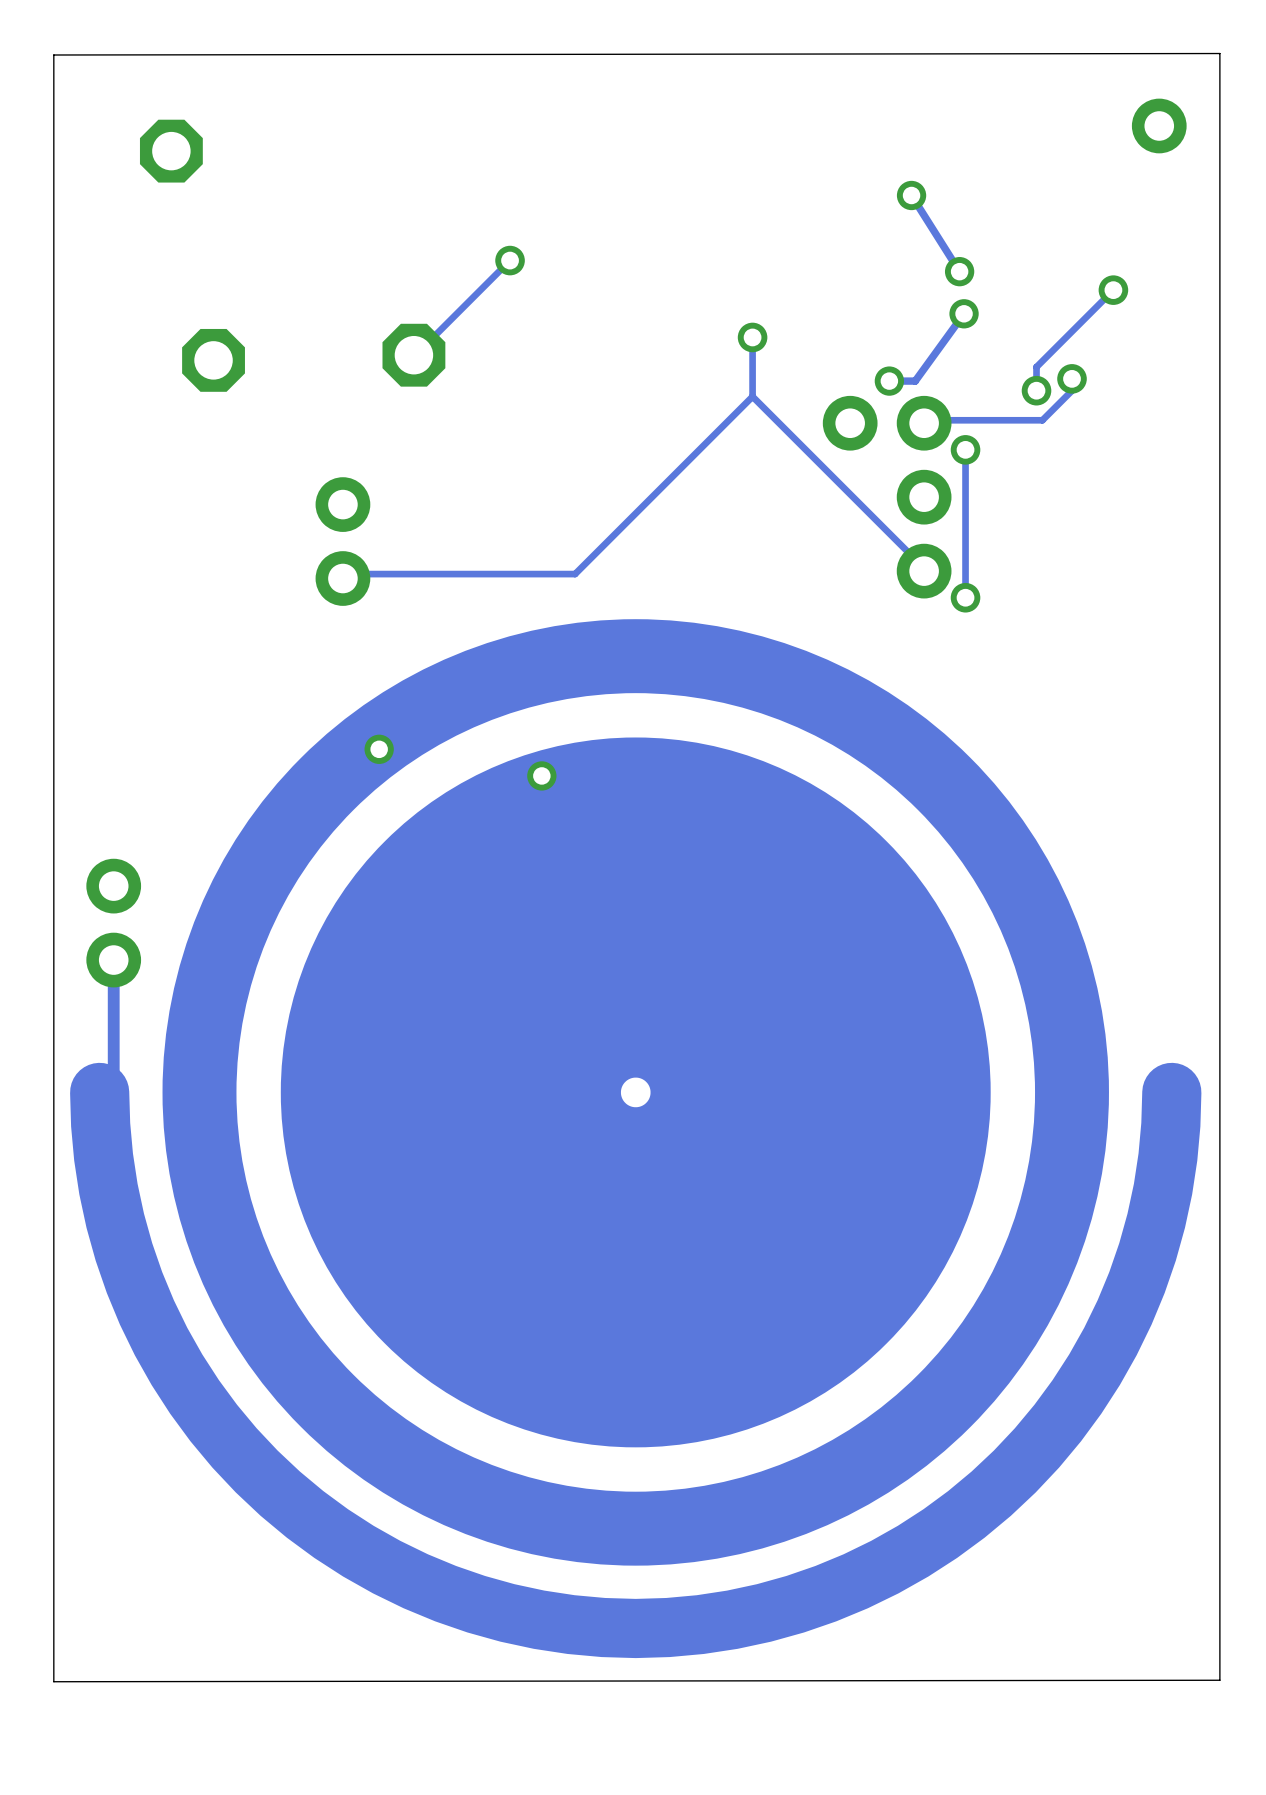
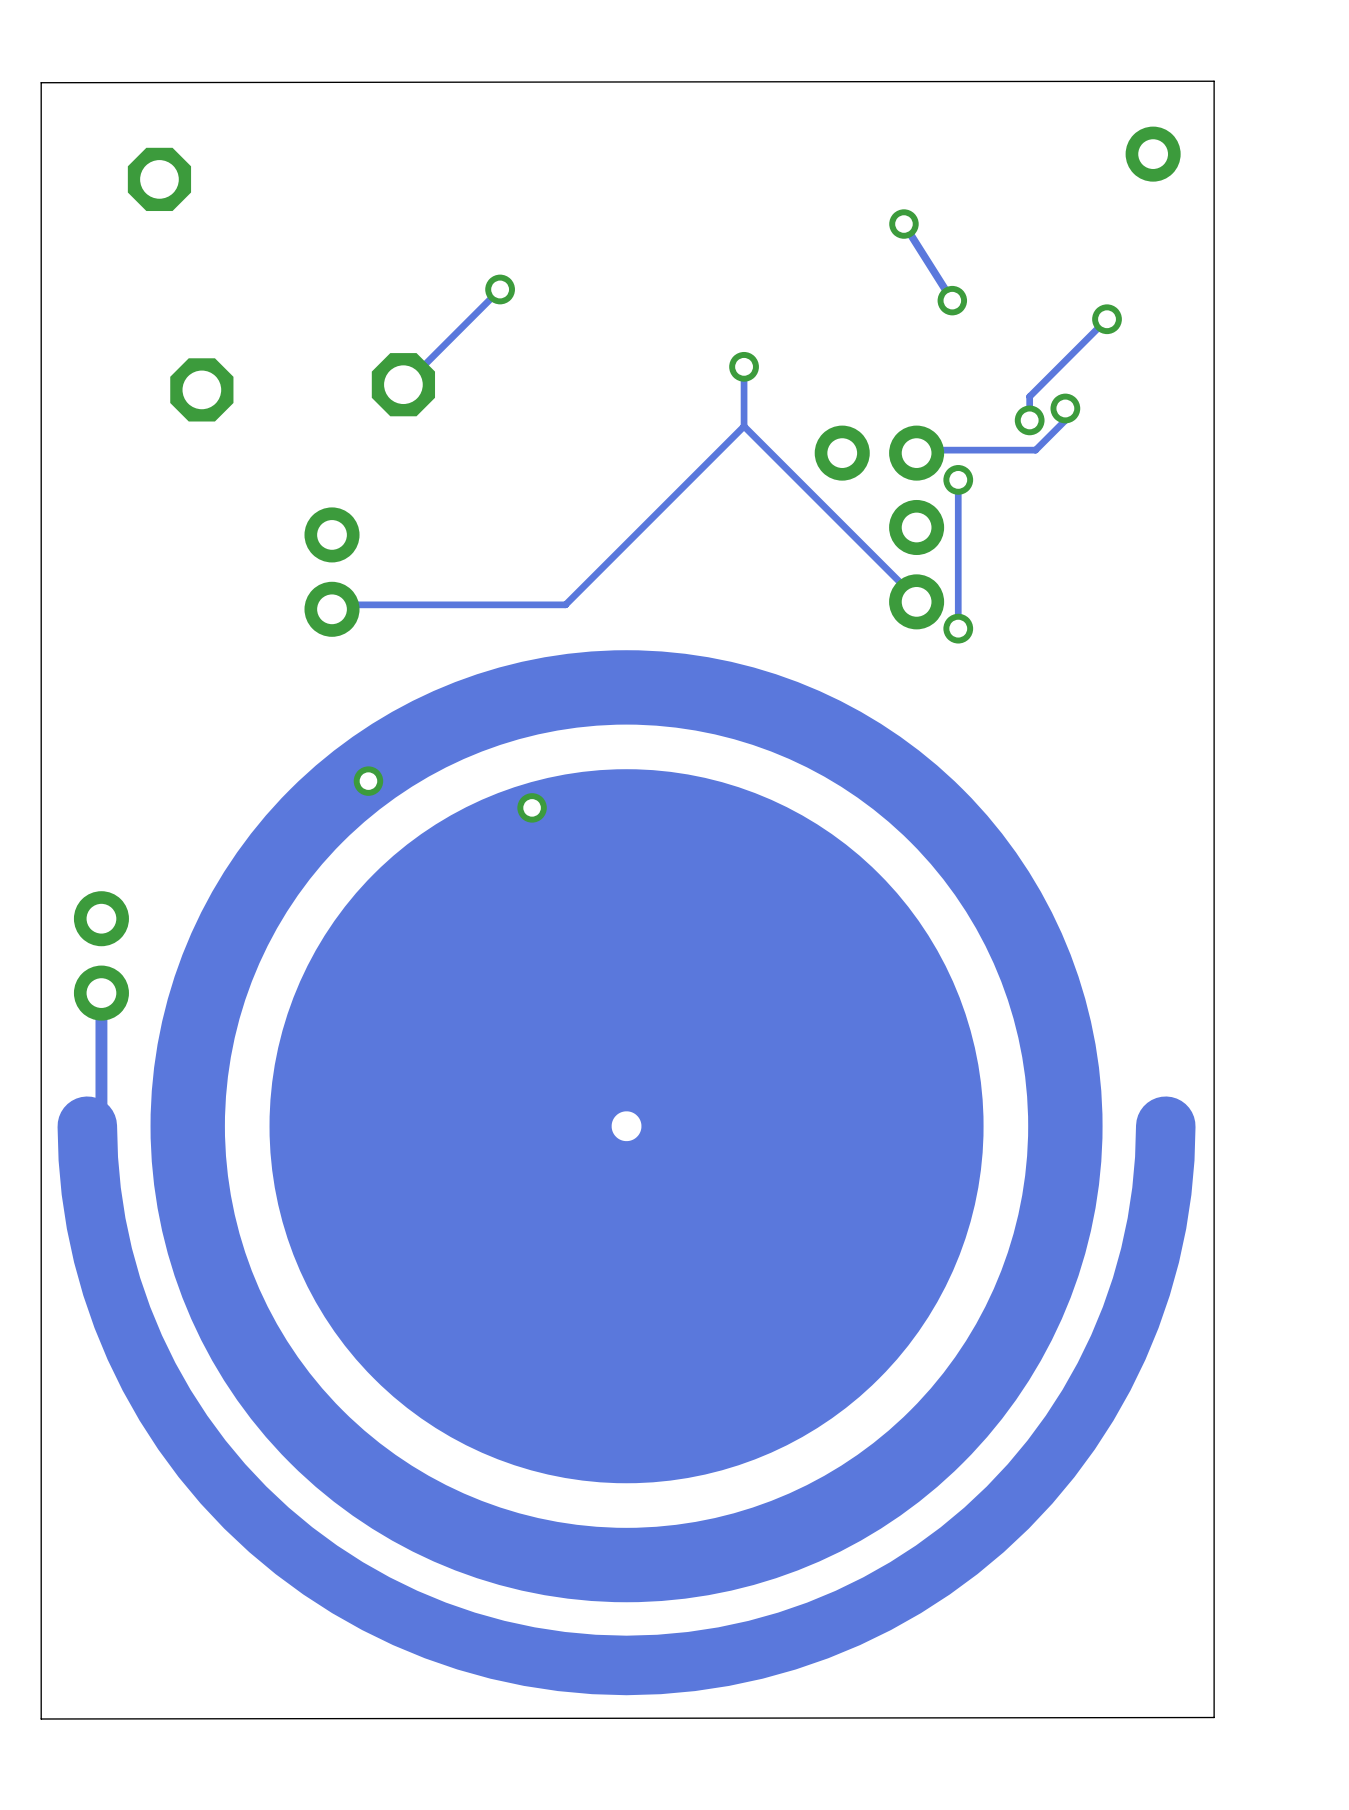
track: (964, 313) (915, 381) (889, 381) -> none
via: (964, 313) -> none
via: (889, 381) -> none

